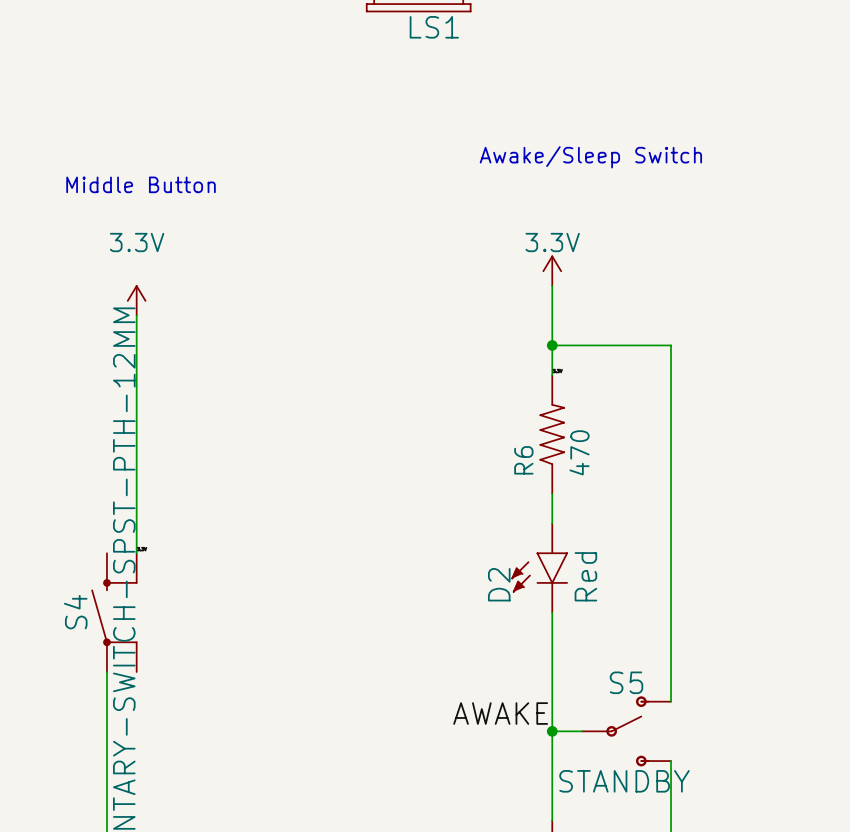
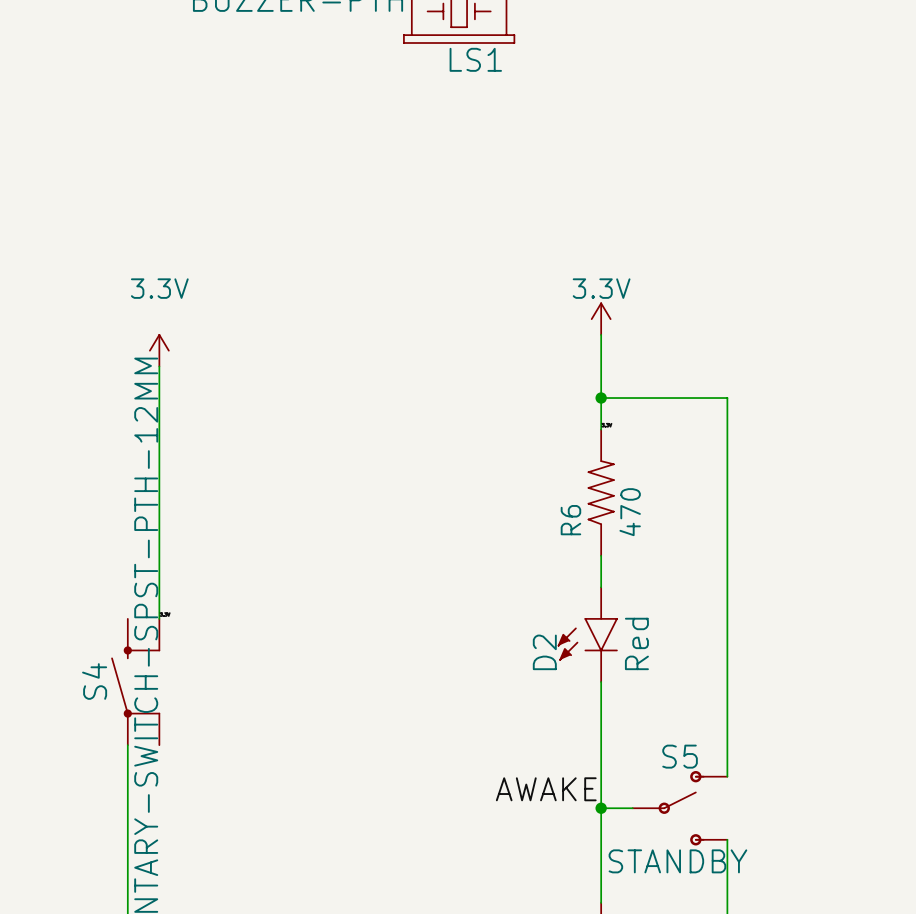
text: Awake/Sleep Switch (590, 157) -> none
text: Middle Button (141, 184) -> none

